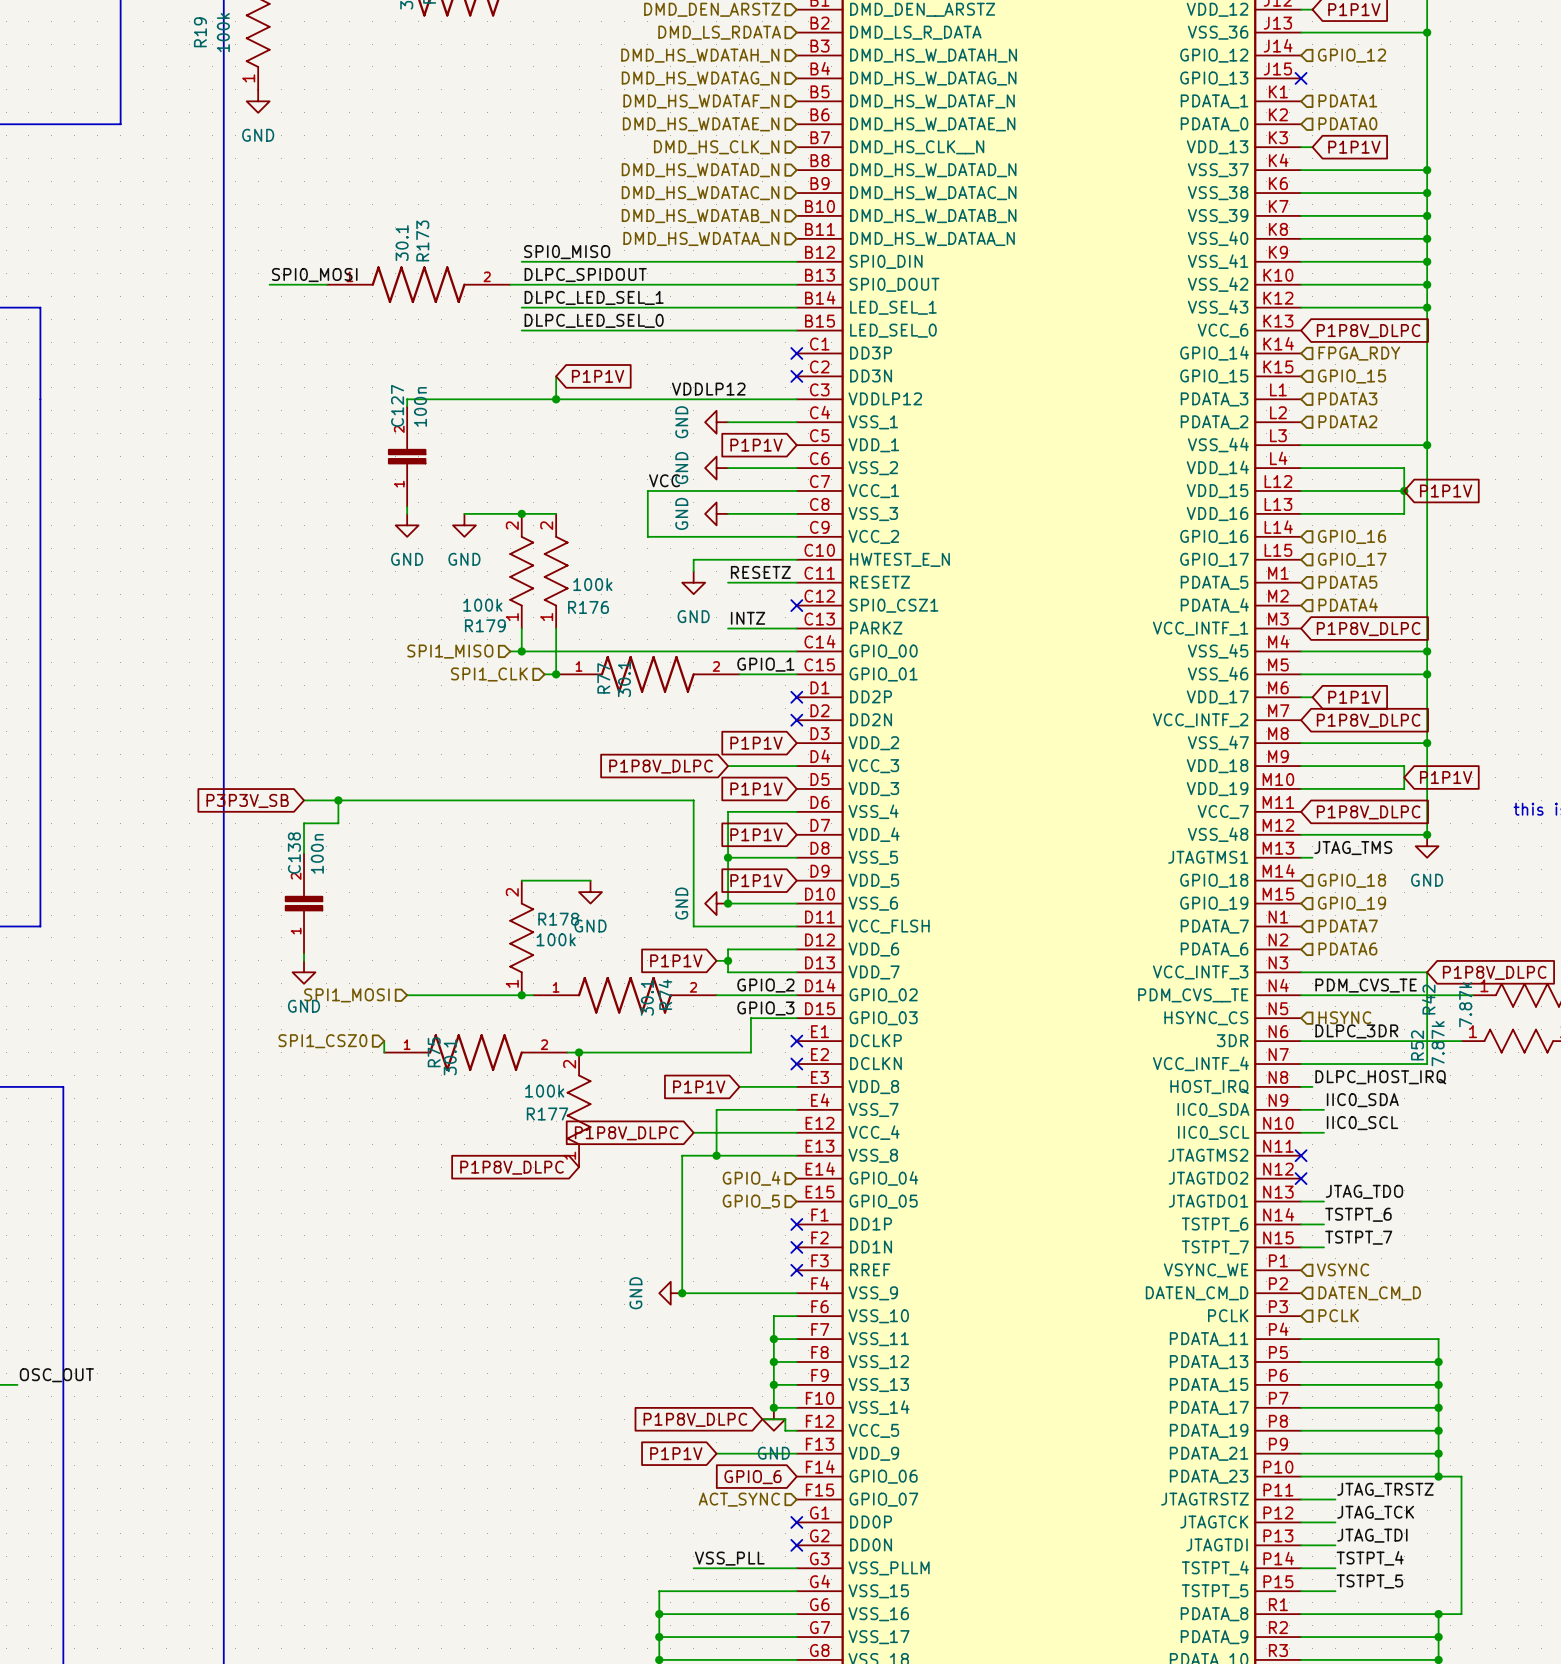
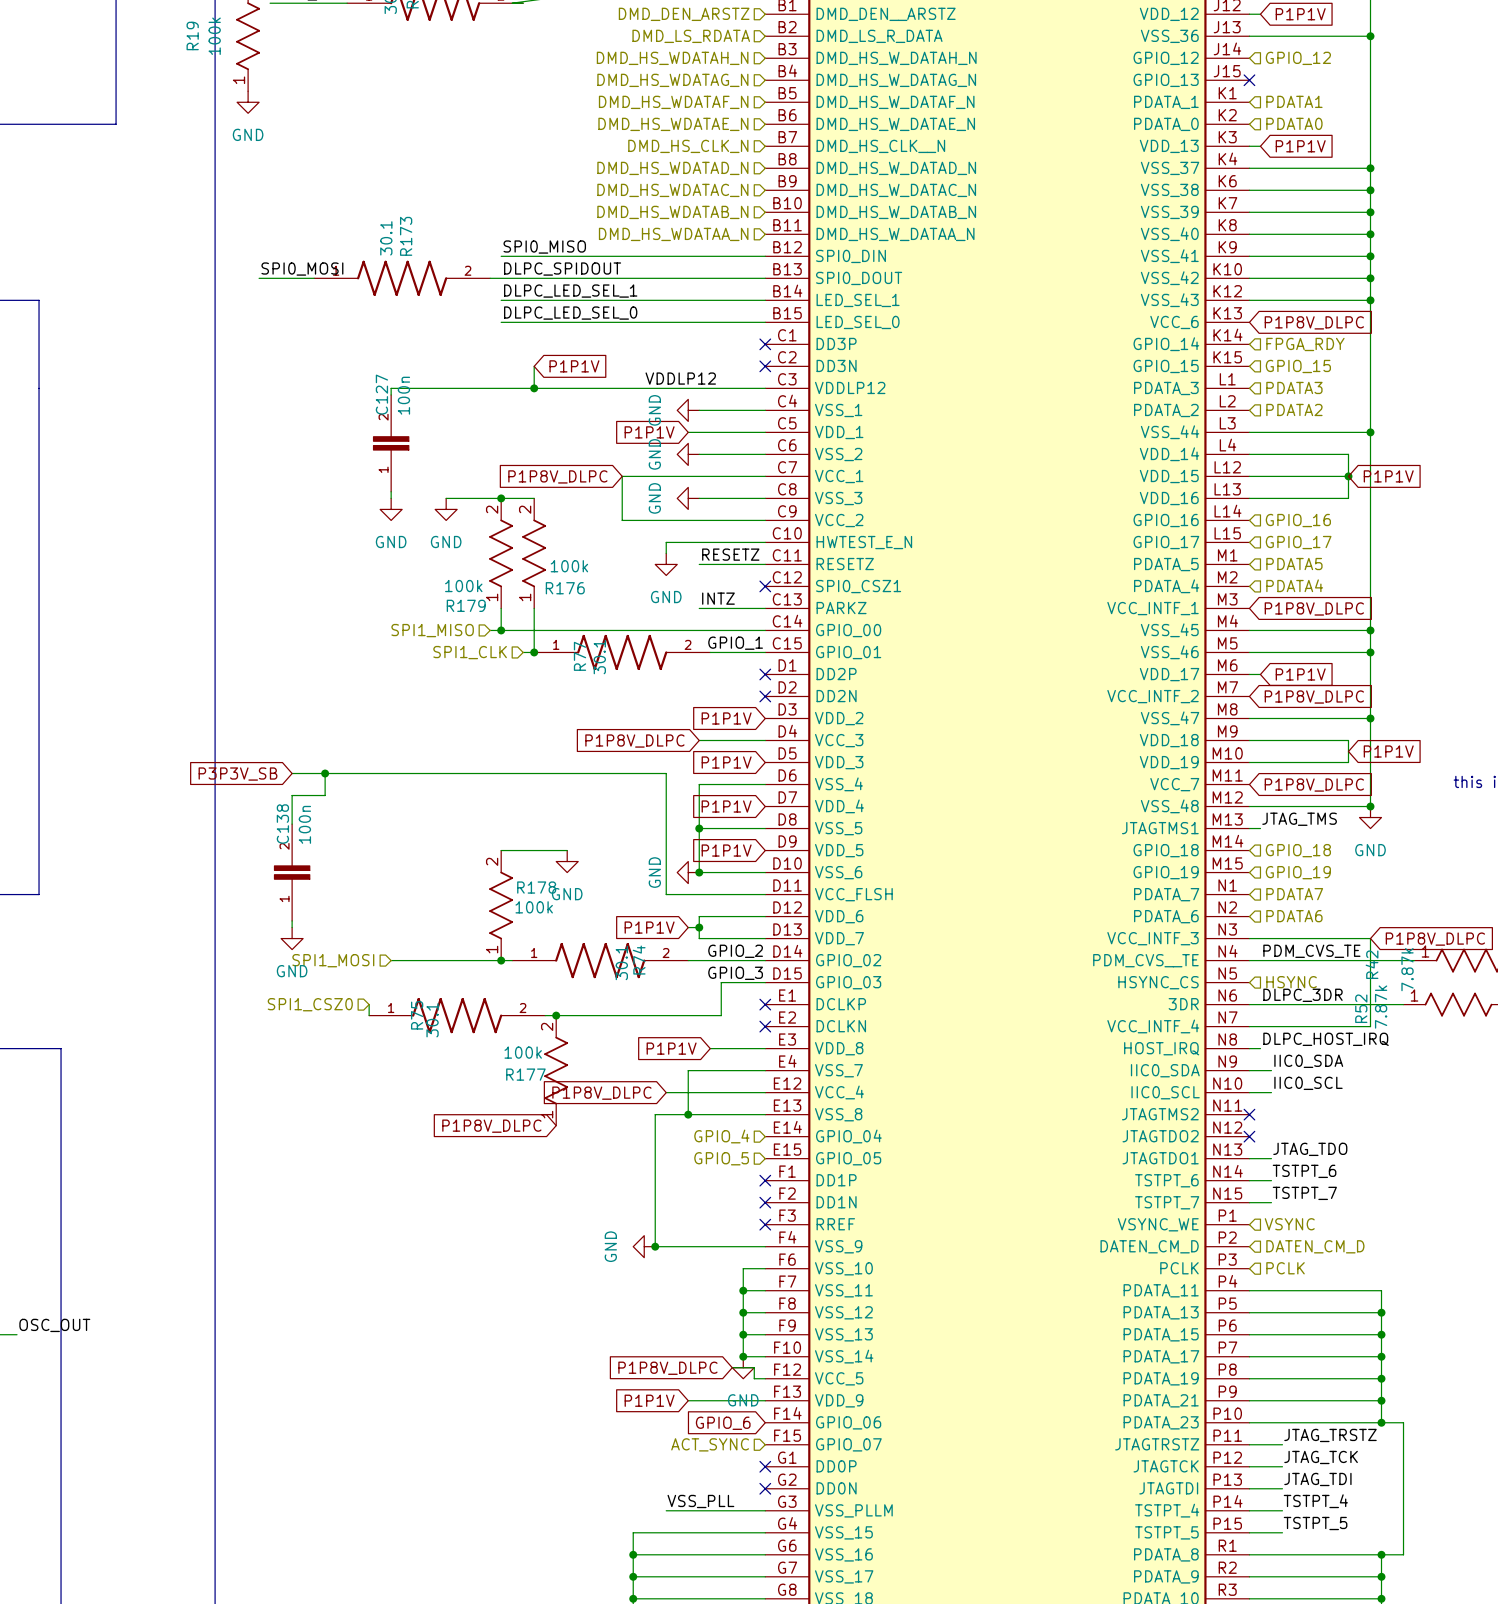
wire: none -> (688, 432) (765, 432)
global label position: P1P1V (756, 445) -> P1P1V (649, 432)
label: VCC (664, 480) -> none
global label: none -> P1P8V_DLPC (557, 476)

